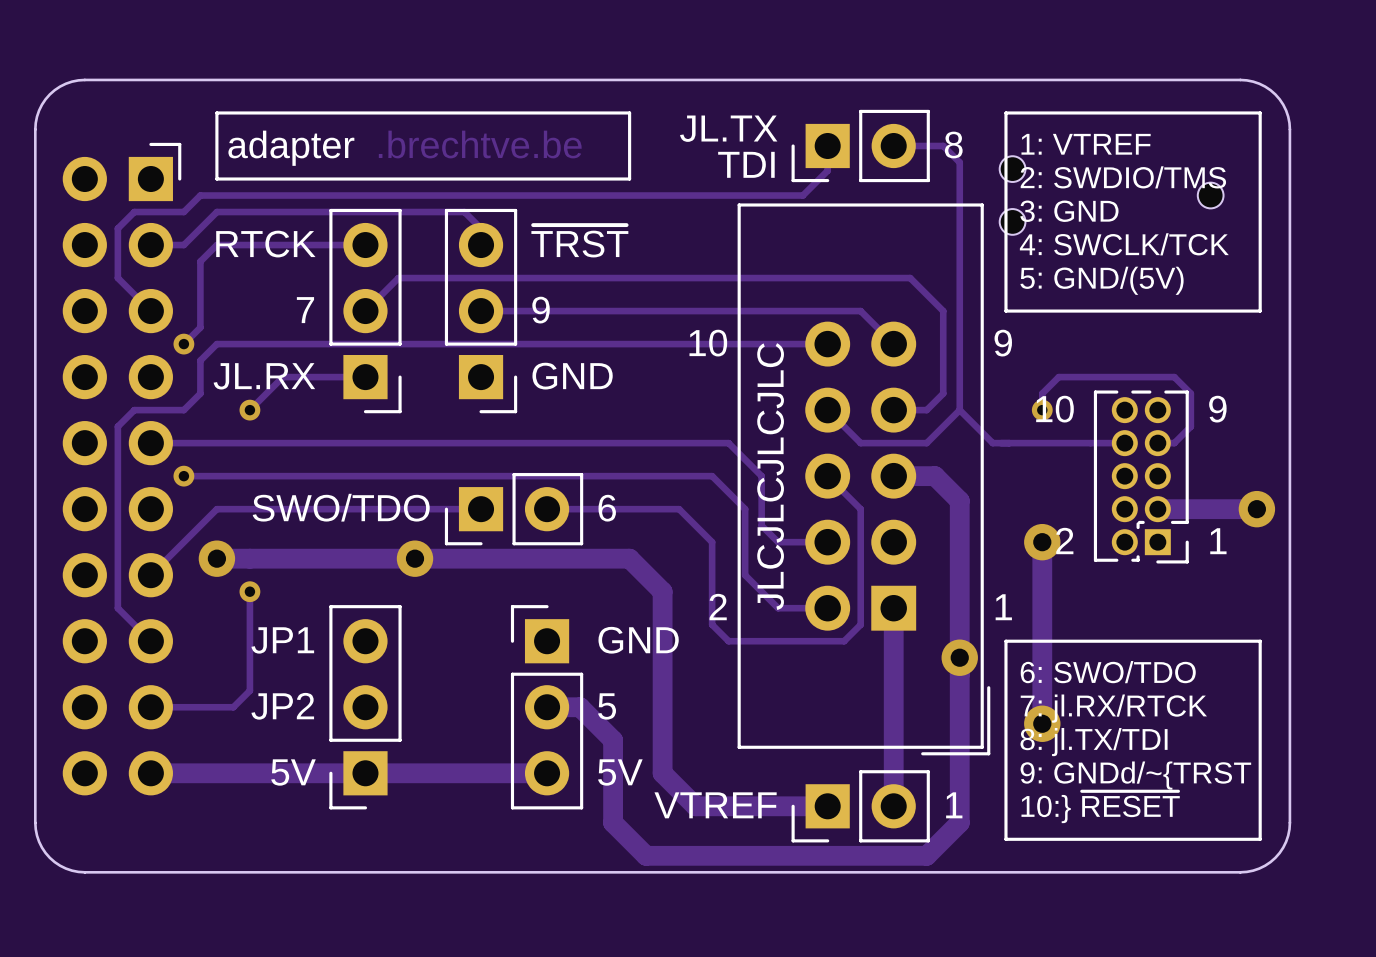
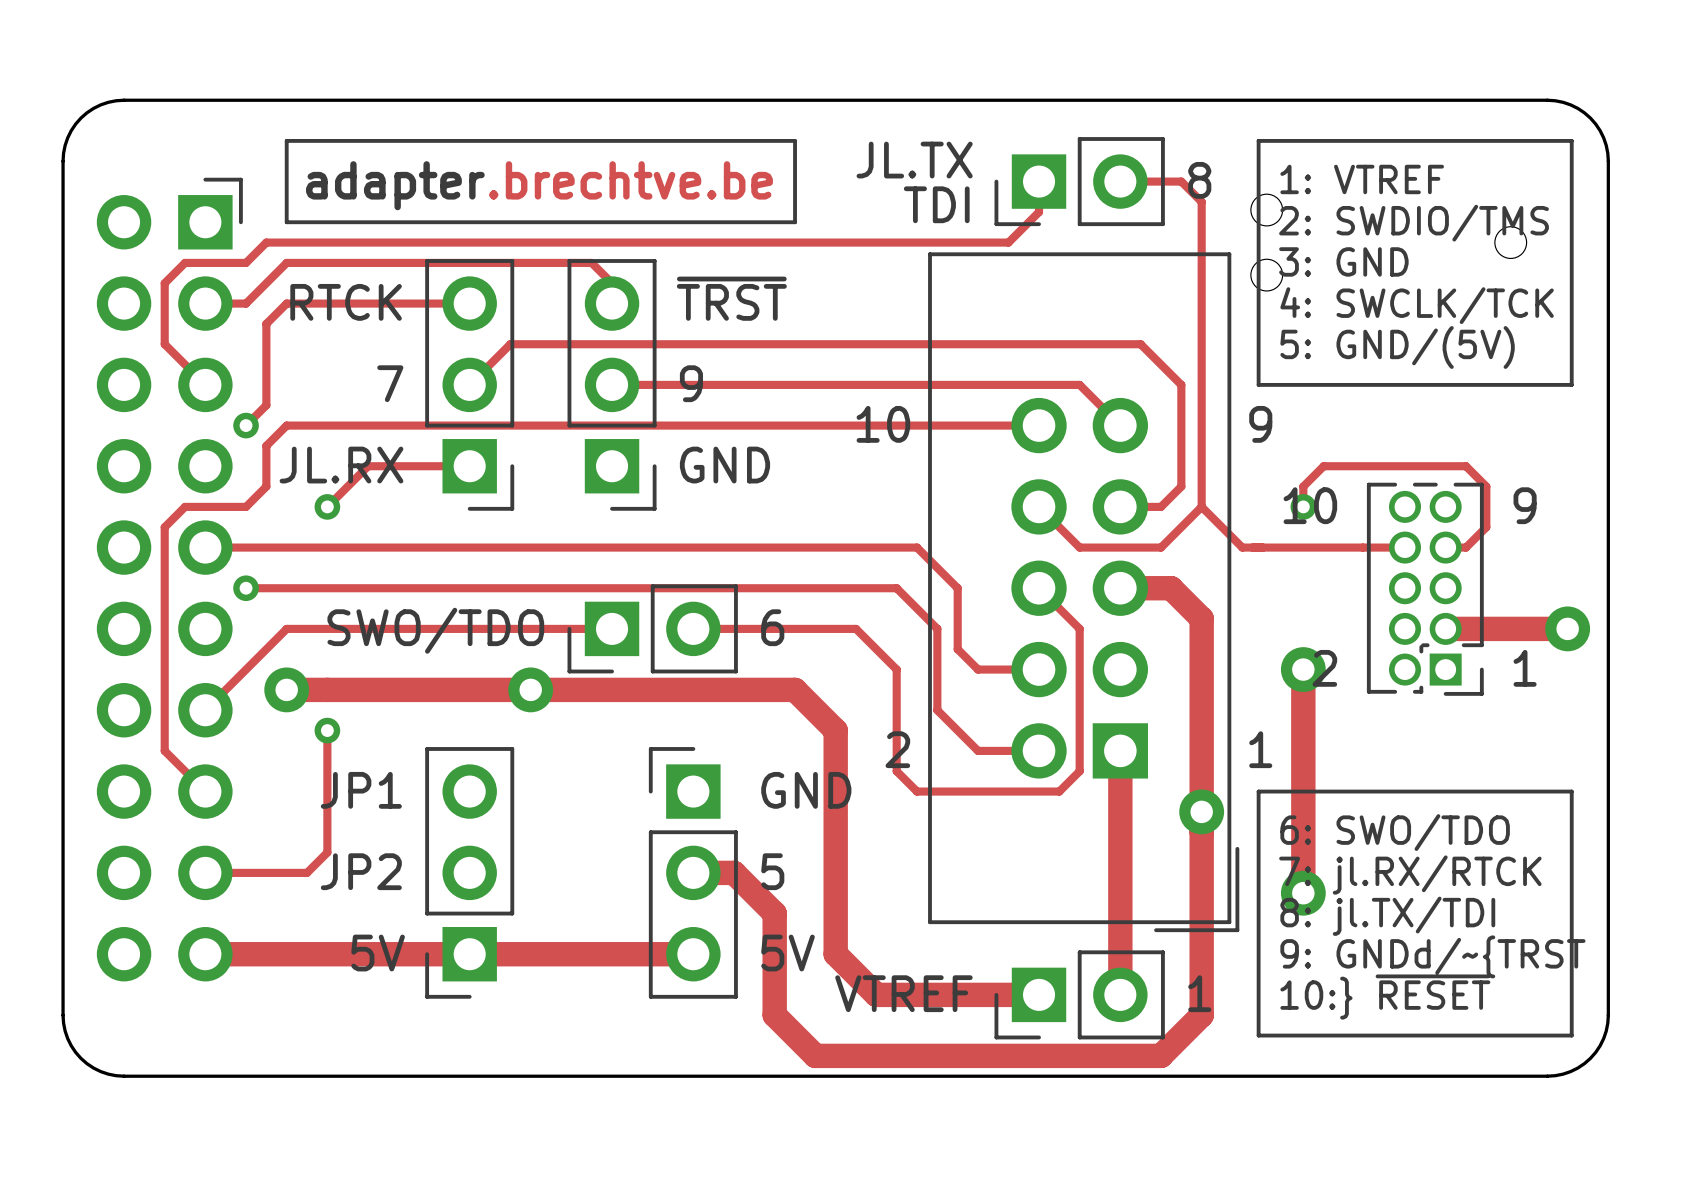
text: JLCJLCJLCJLC (770, 476) -> none

